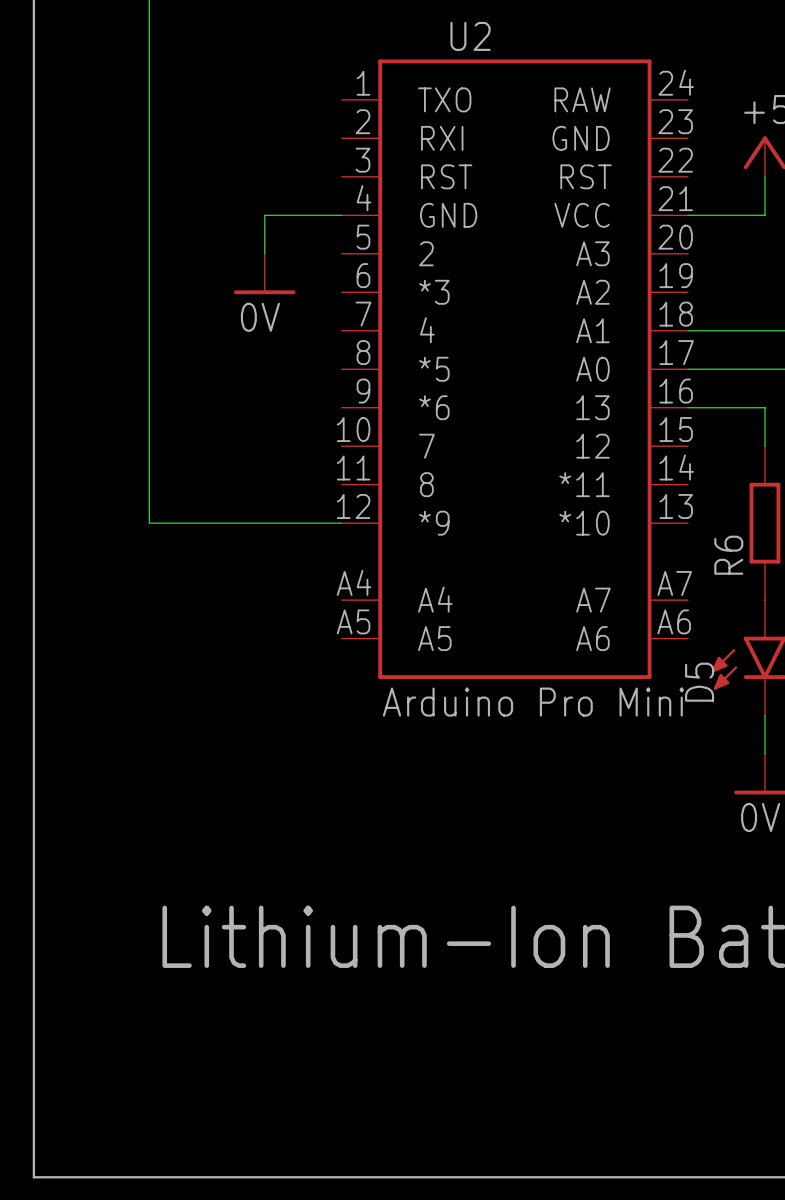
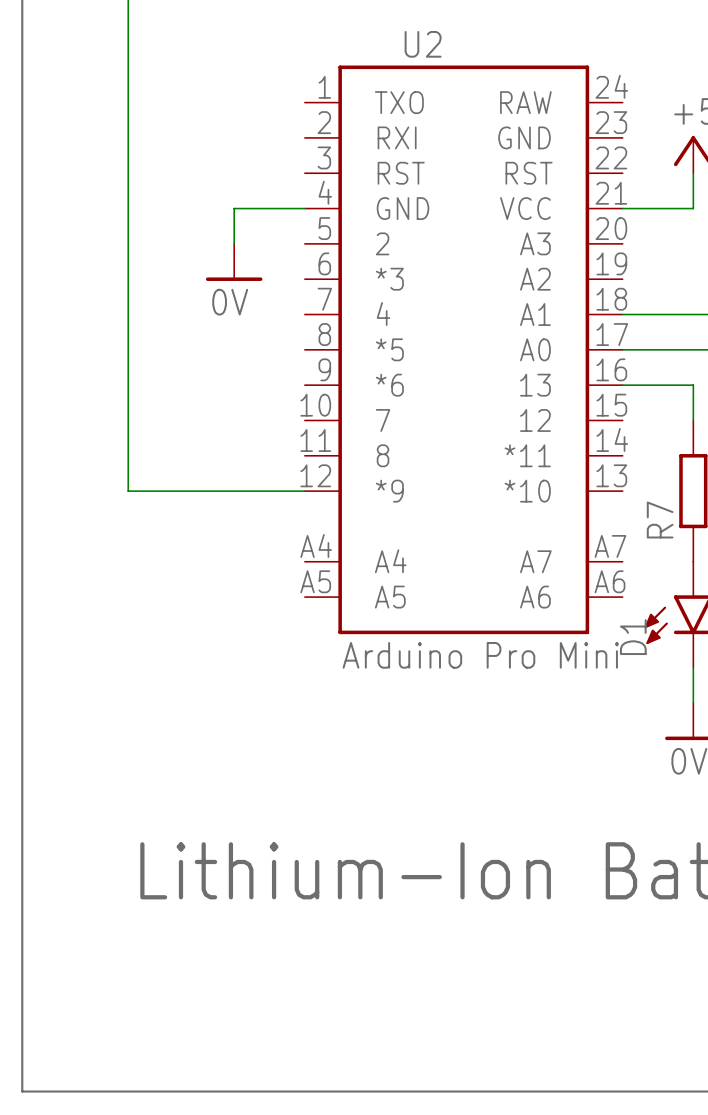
R6 name: R6 (728, 555) -> R7 (660, 520)
D5 name: D5 (699, 682) -> D1 (633, 637)

